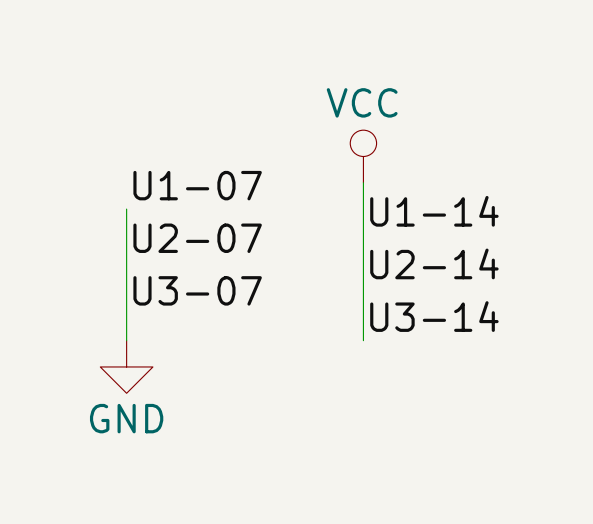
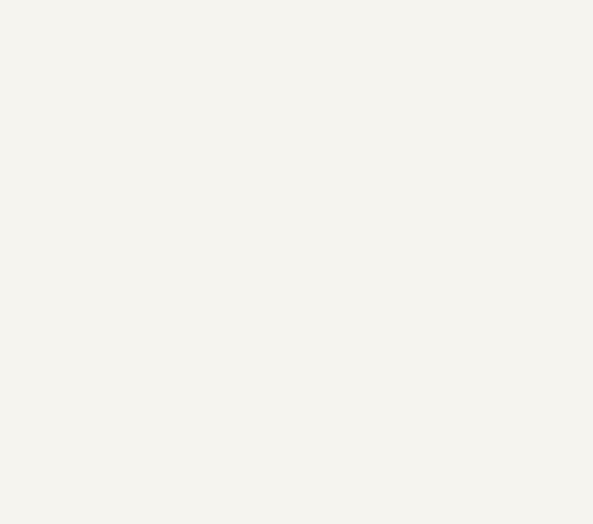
power symbol: VCC (363, 156) -> none
wire: (363, 182) (363, 340) -> none
label: U1-07 (197, 185) -> none
wire: (126, 209) (126, 340) -> none
label: U1-14 (434, 211) -> none
label: U2-07 (197, 238) -> none
label: U2-14 (434, 263) -> none
label: U3-07 (197, 290) -> none
label: U3-14 (434, 316) -> none
power symbol: GND (126, 366) -> none

